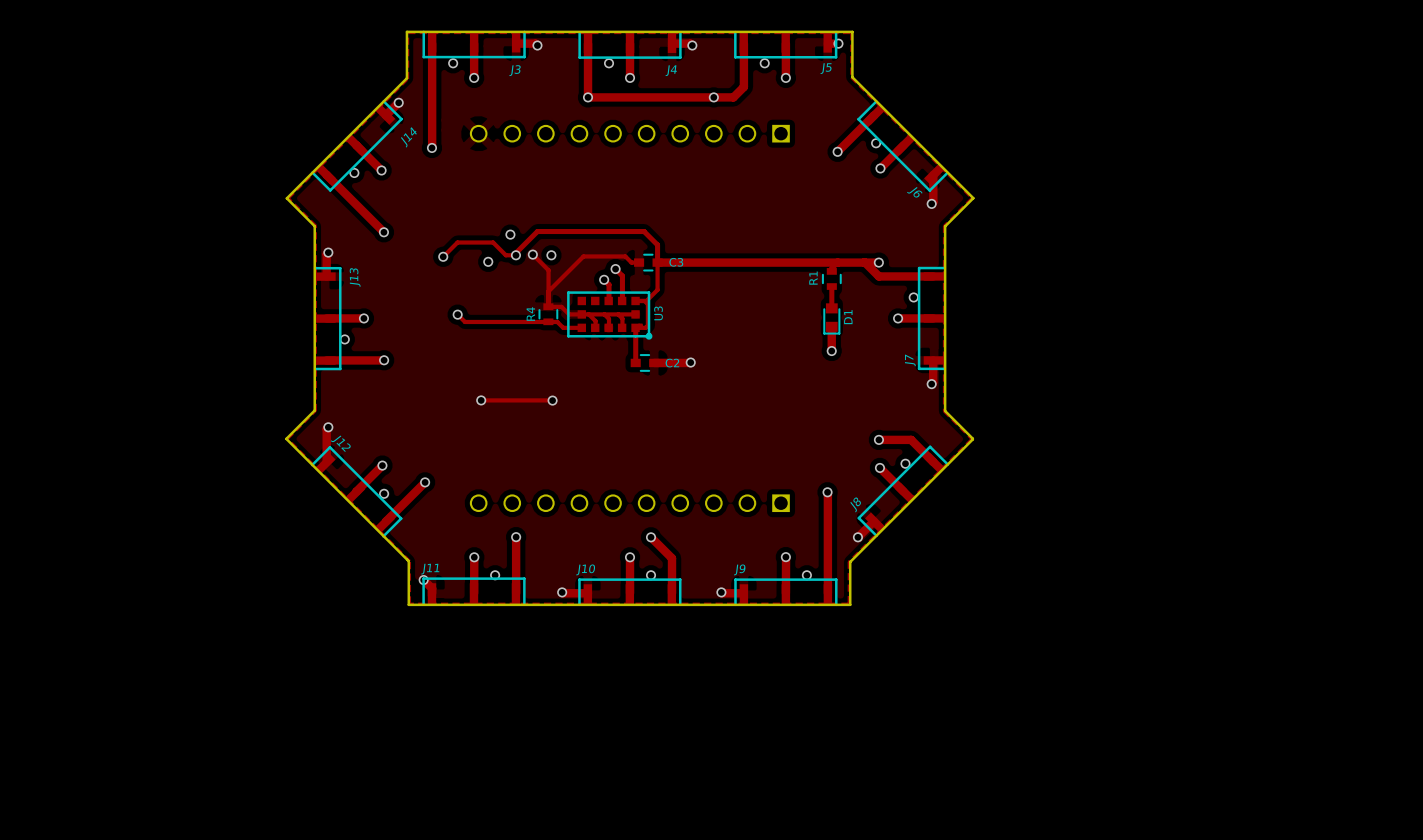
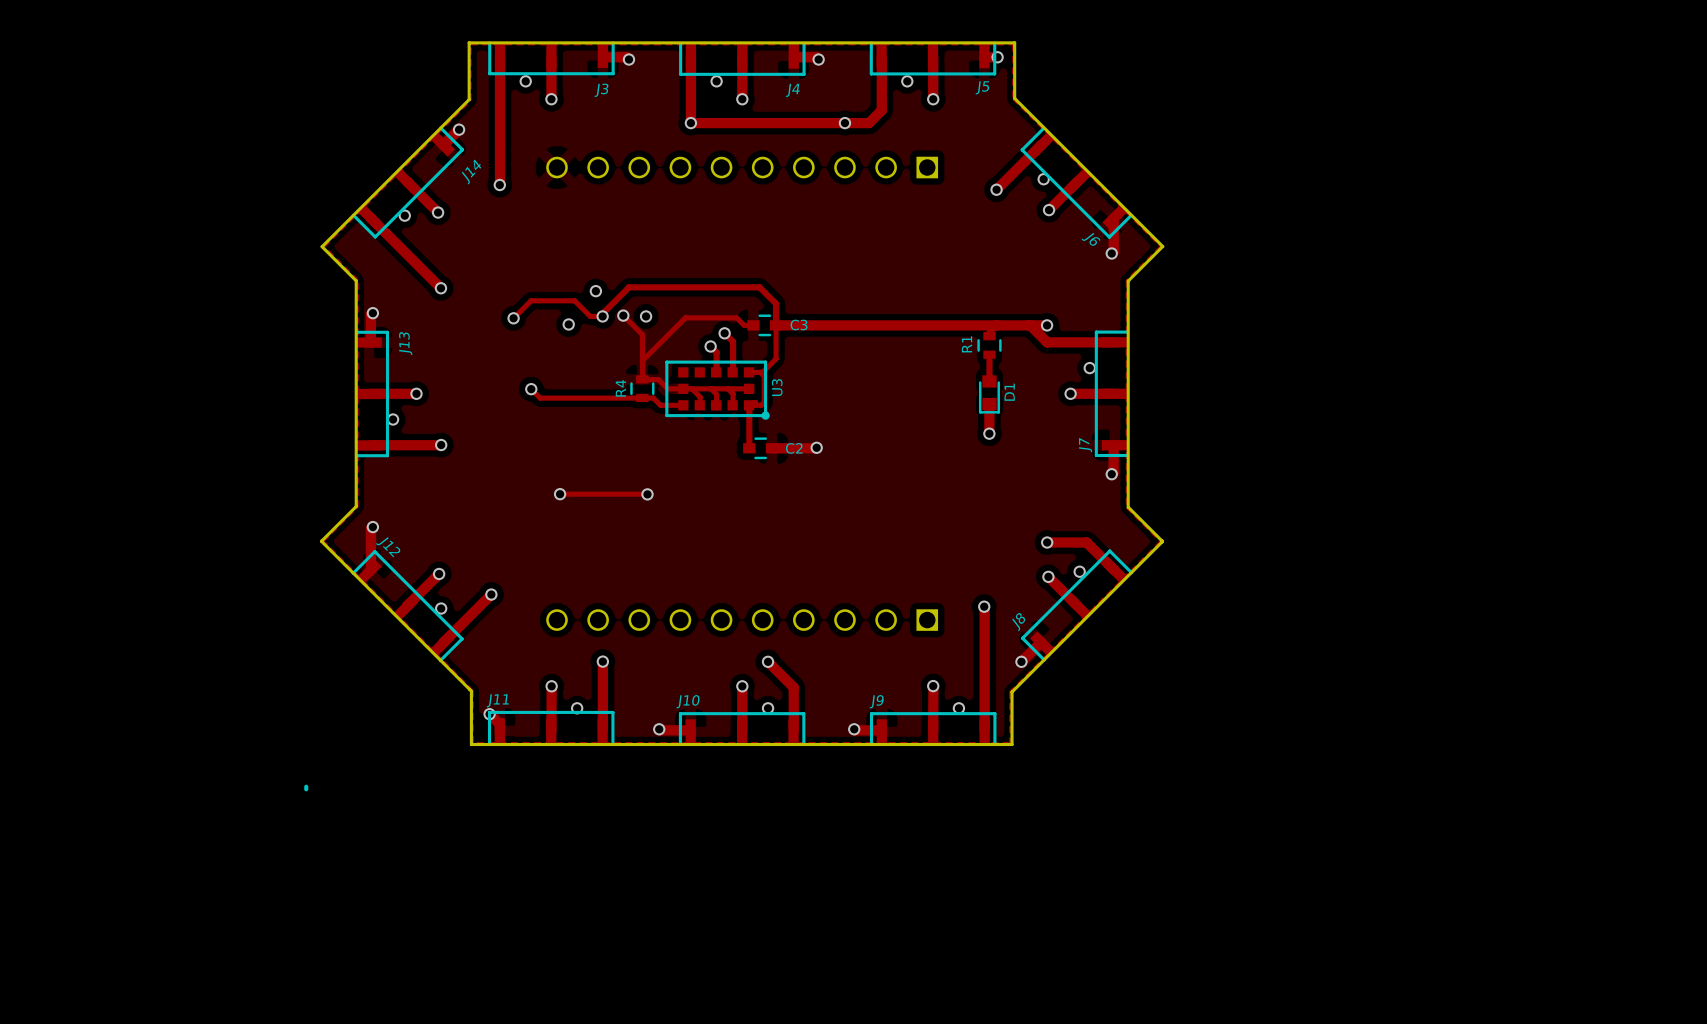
line: none -> (306, 786) (306, 789)

